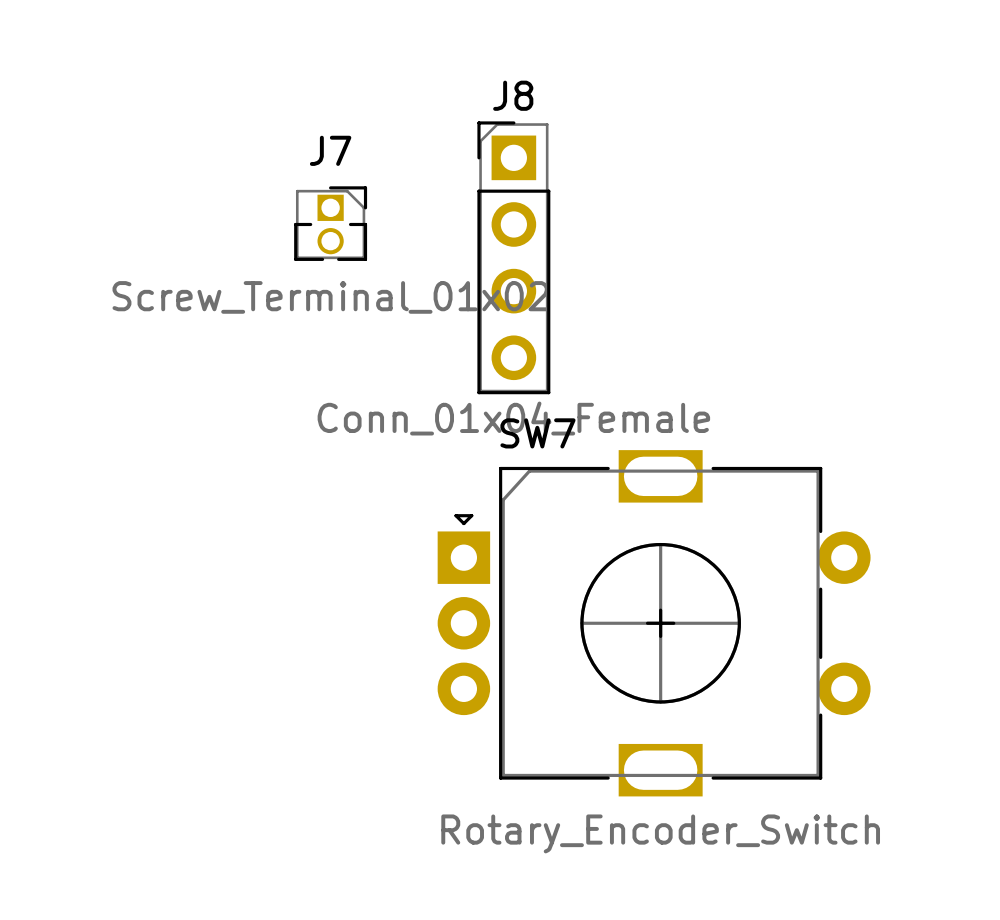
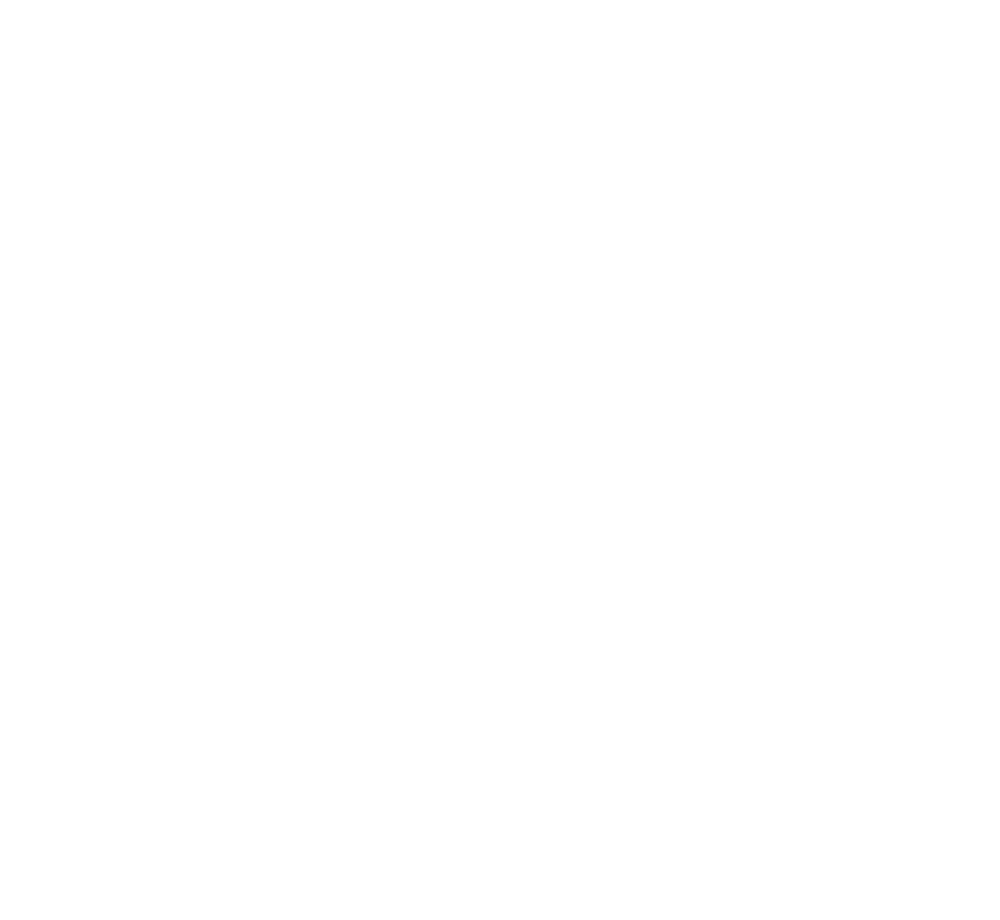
J7: Screw_Terminal_01x02 (330, 223) -> none
J8: Conn_01x04_Female (513, 257) -> none
SW7: Rotary_Encoder_Switch (654, 623) -> none

